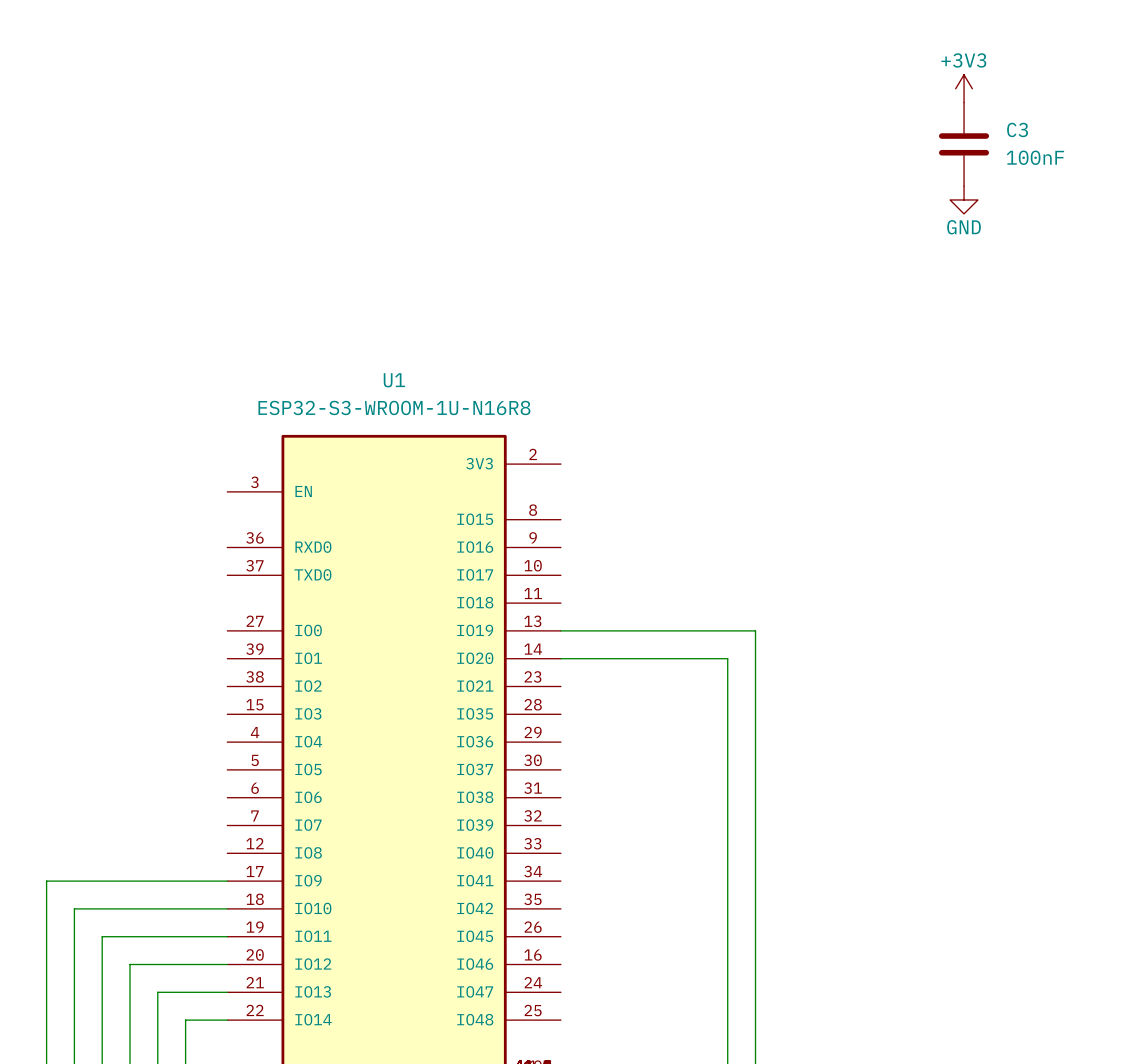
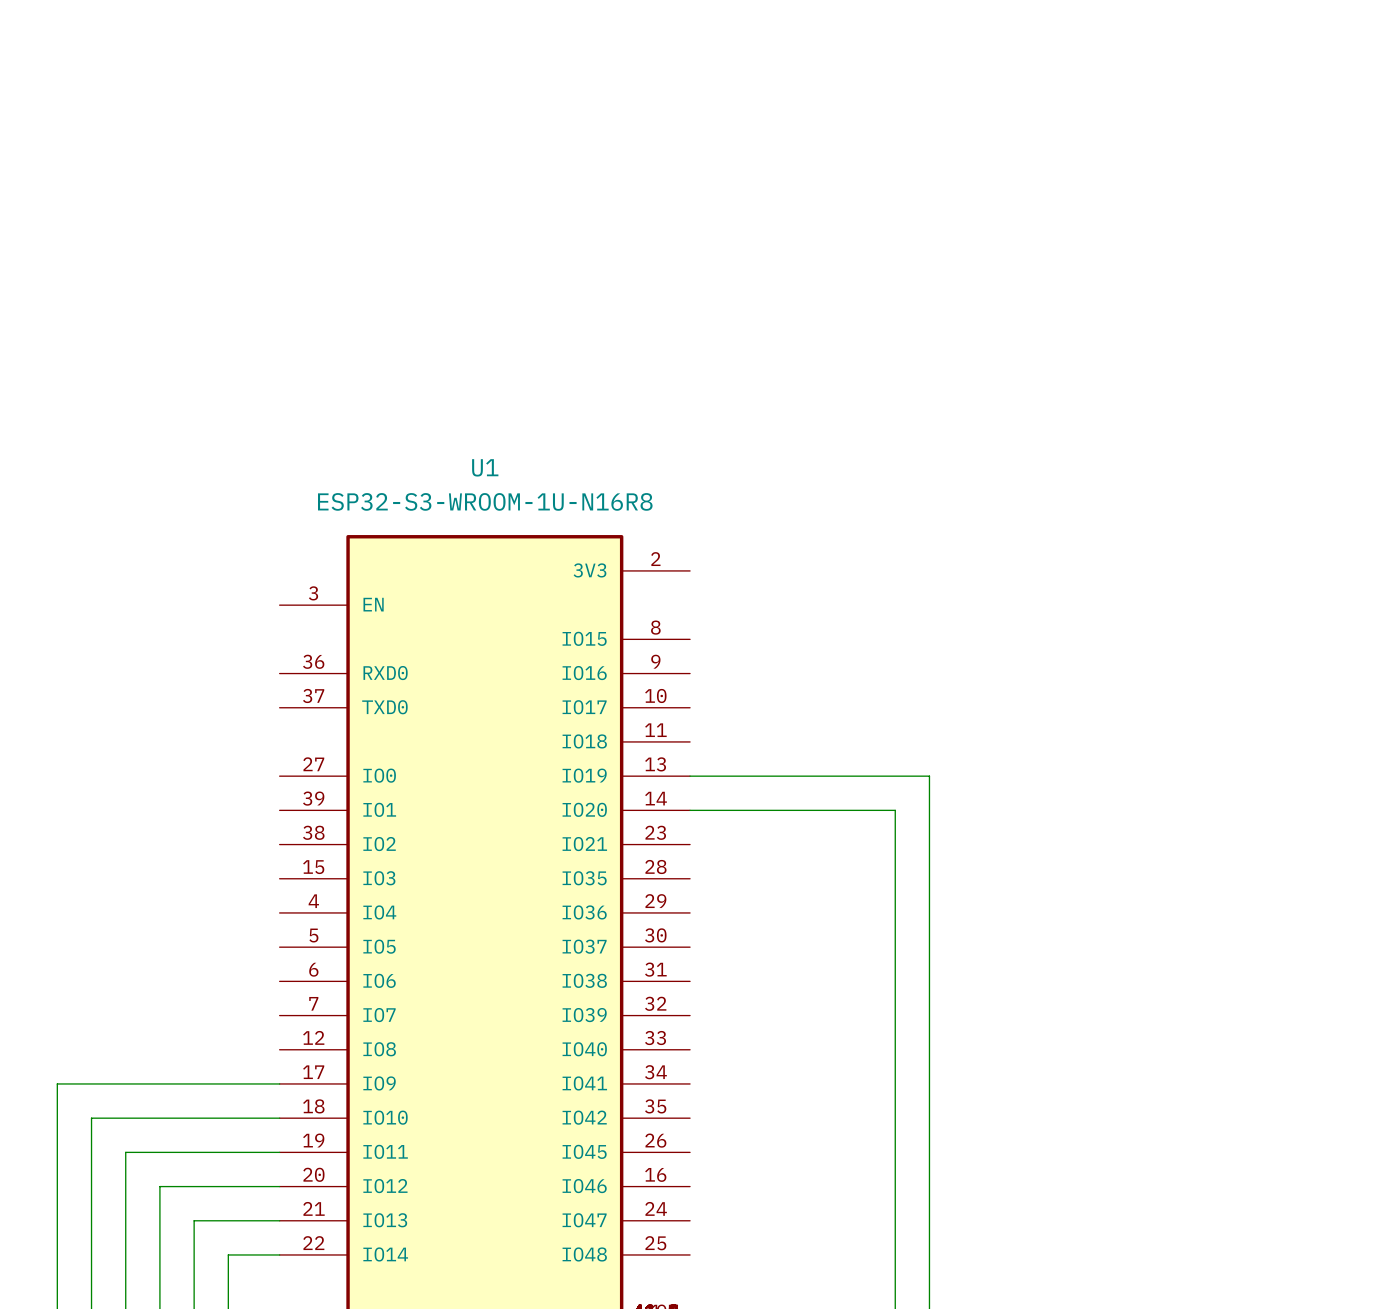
power symbol: +3V3 (964, 88) -> none
C3: 100nF (964, 144) -> none
power symbol: GND (964, 199) -> none

